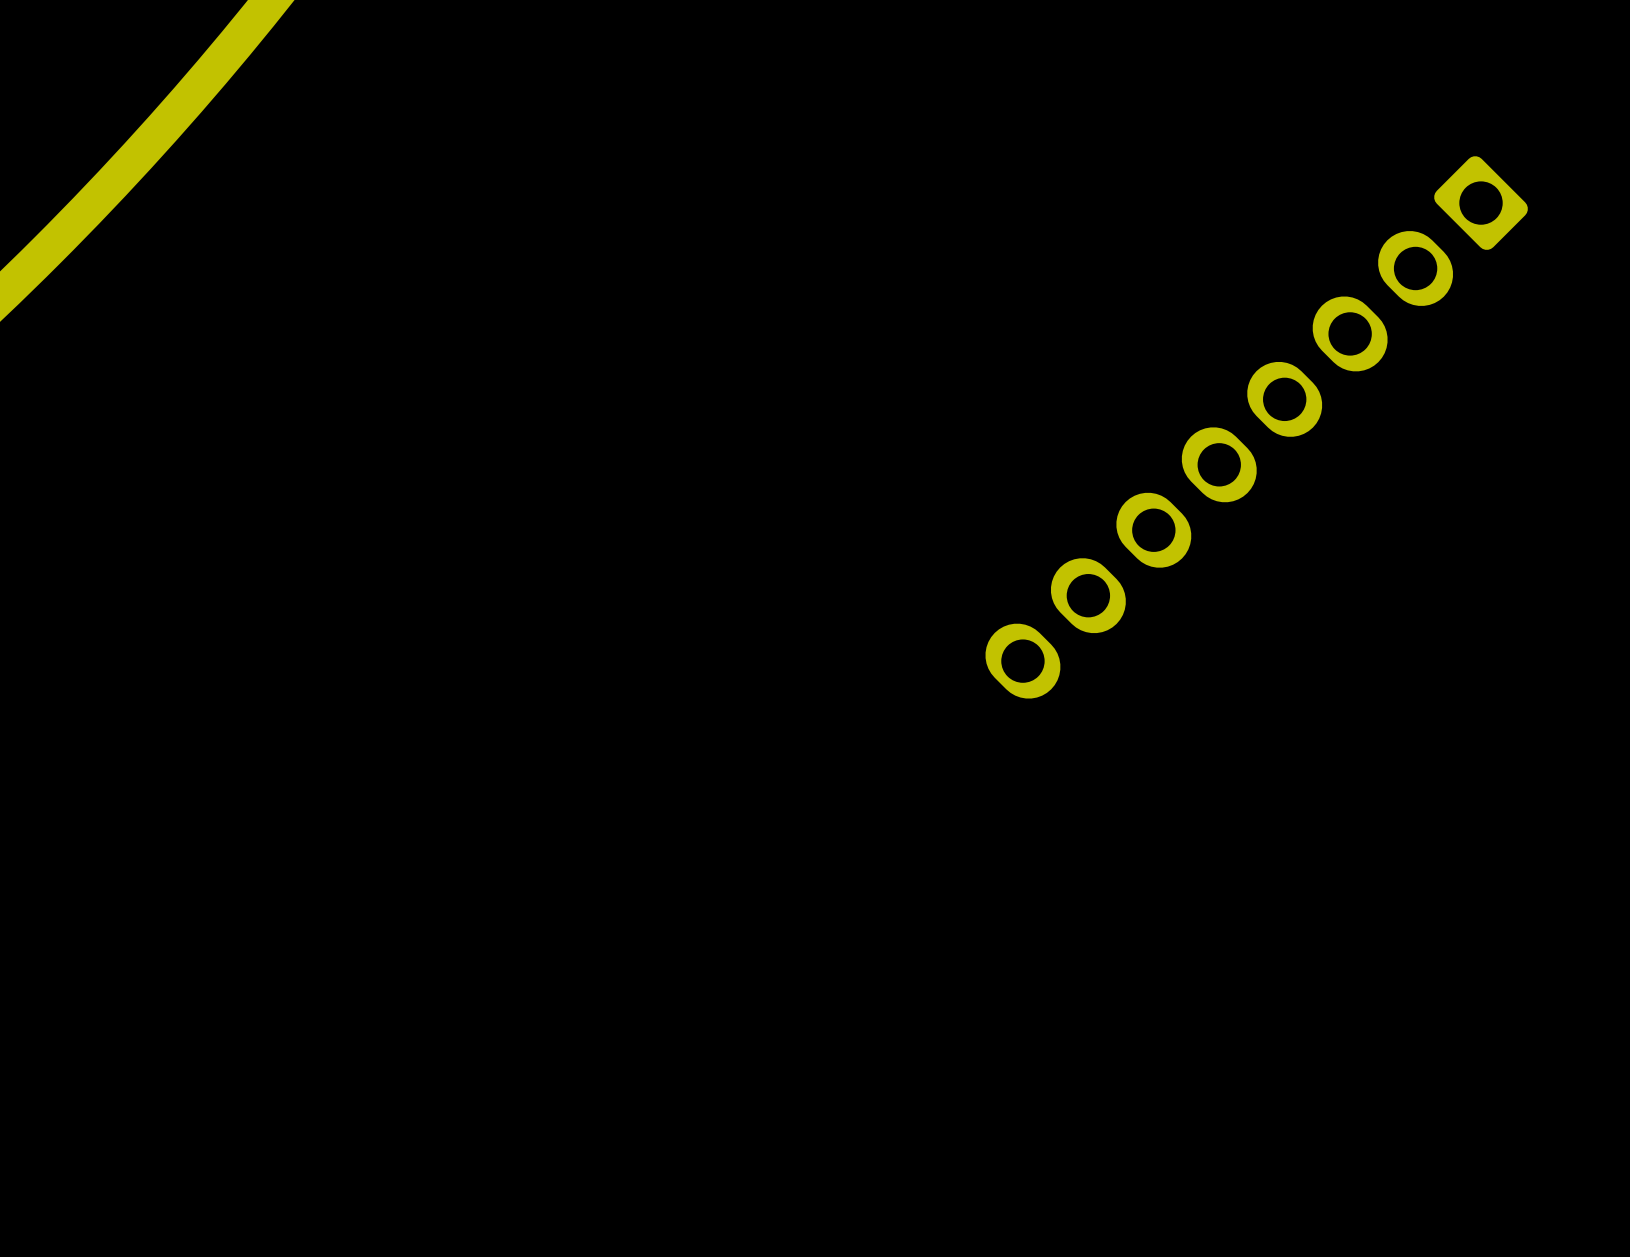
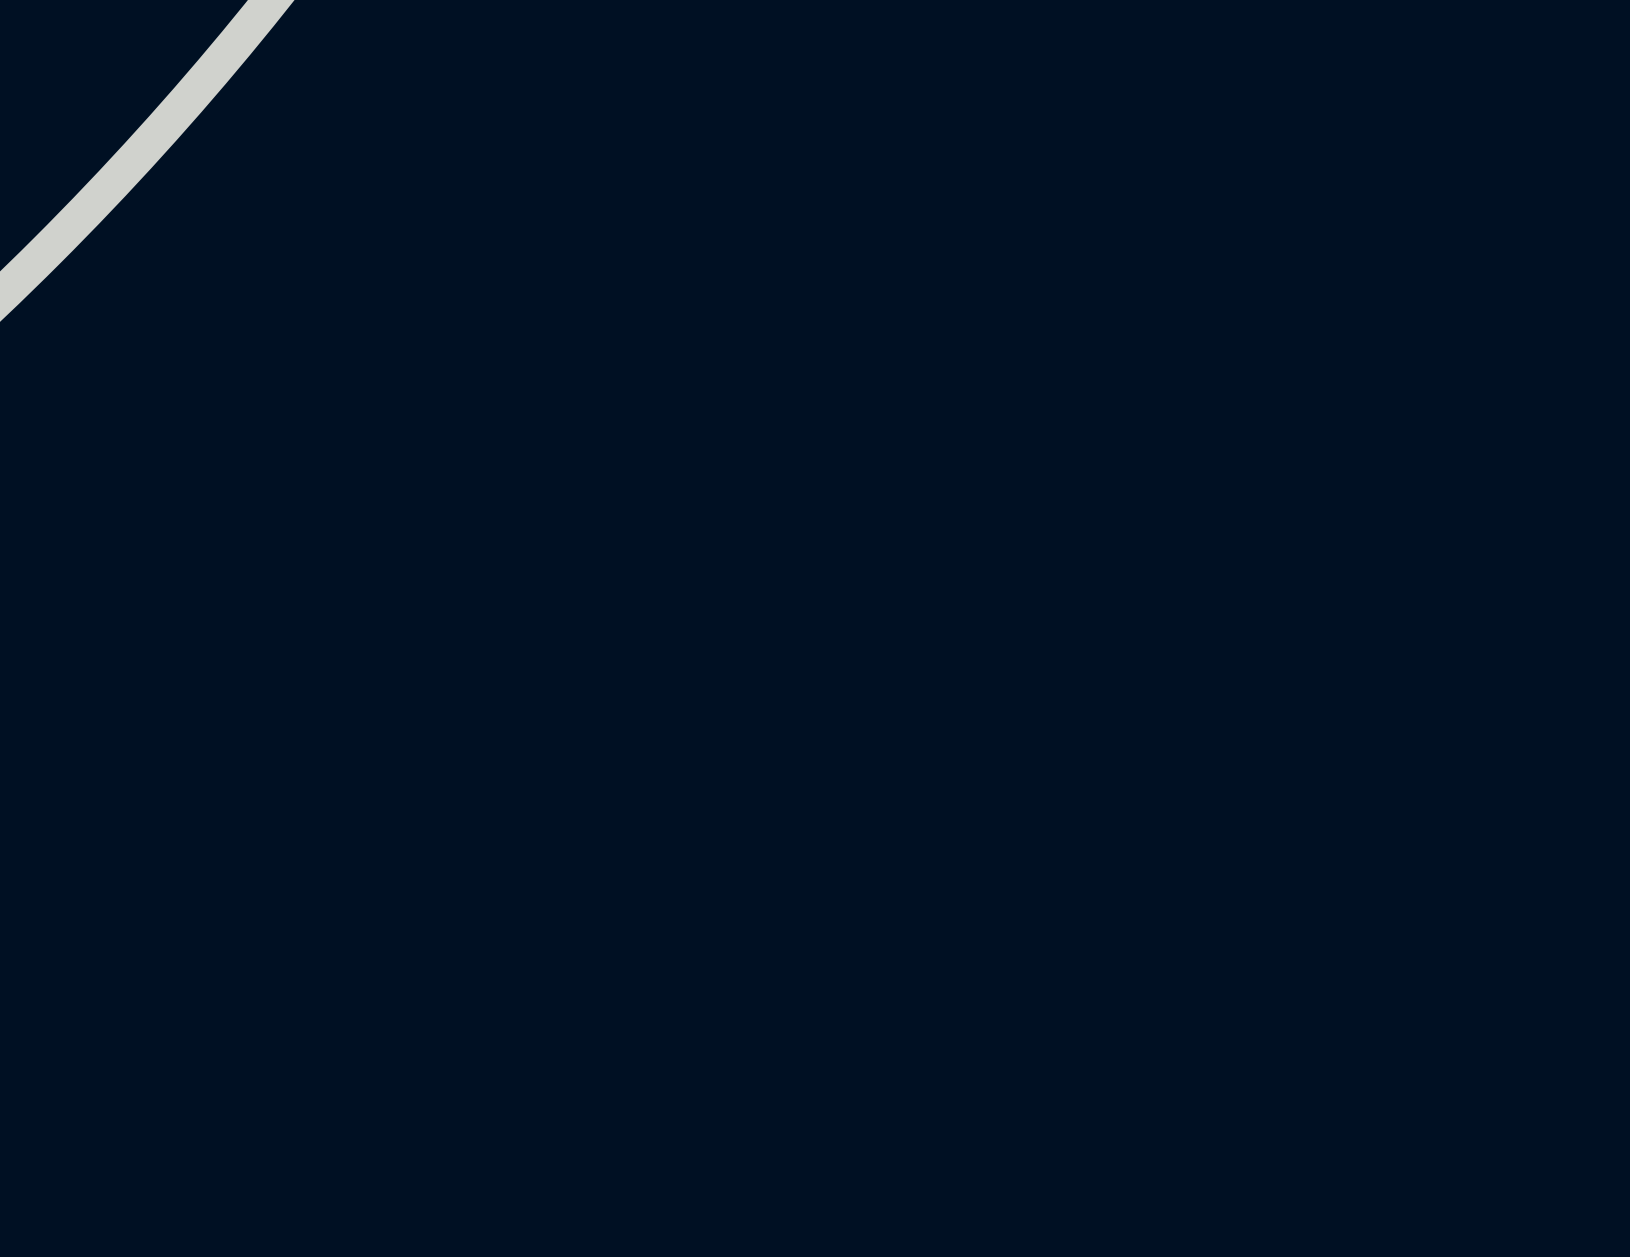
part: (1256, 427) -> none

